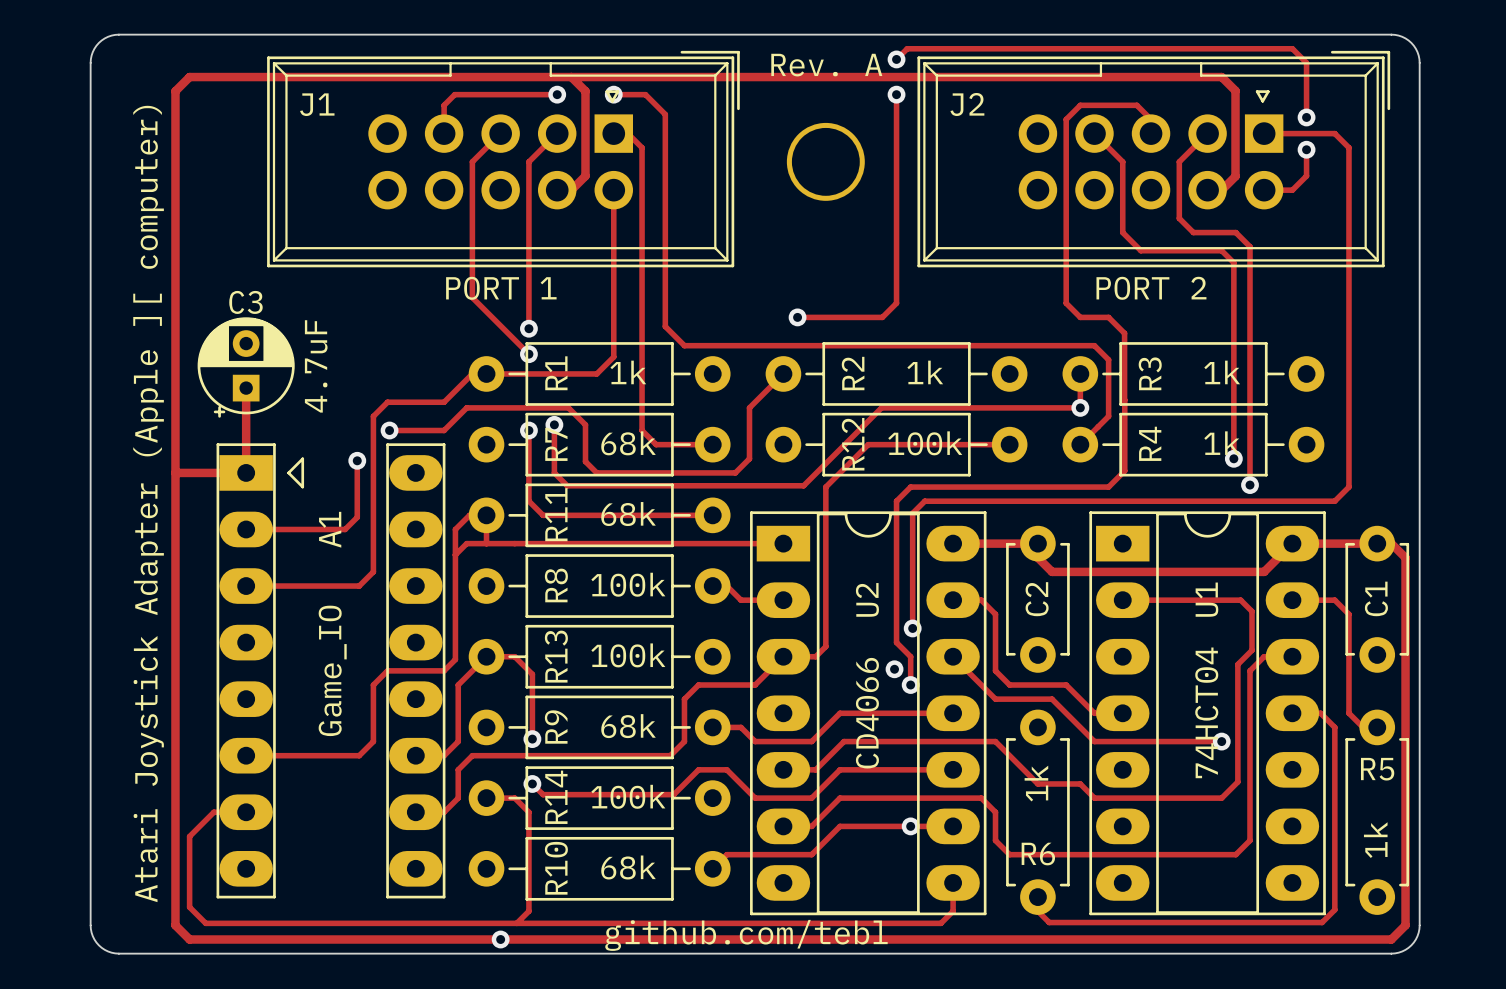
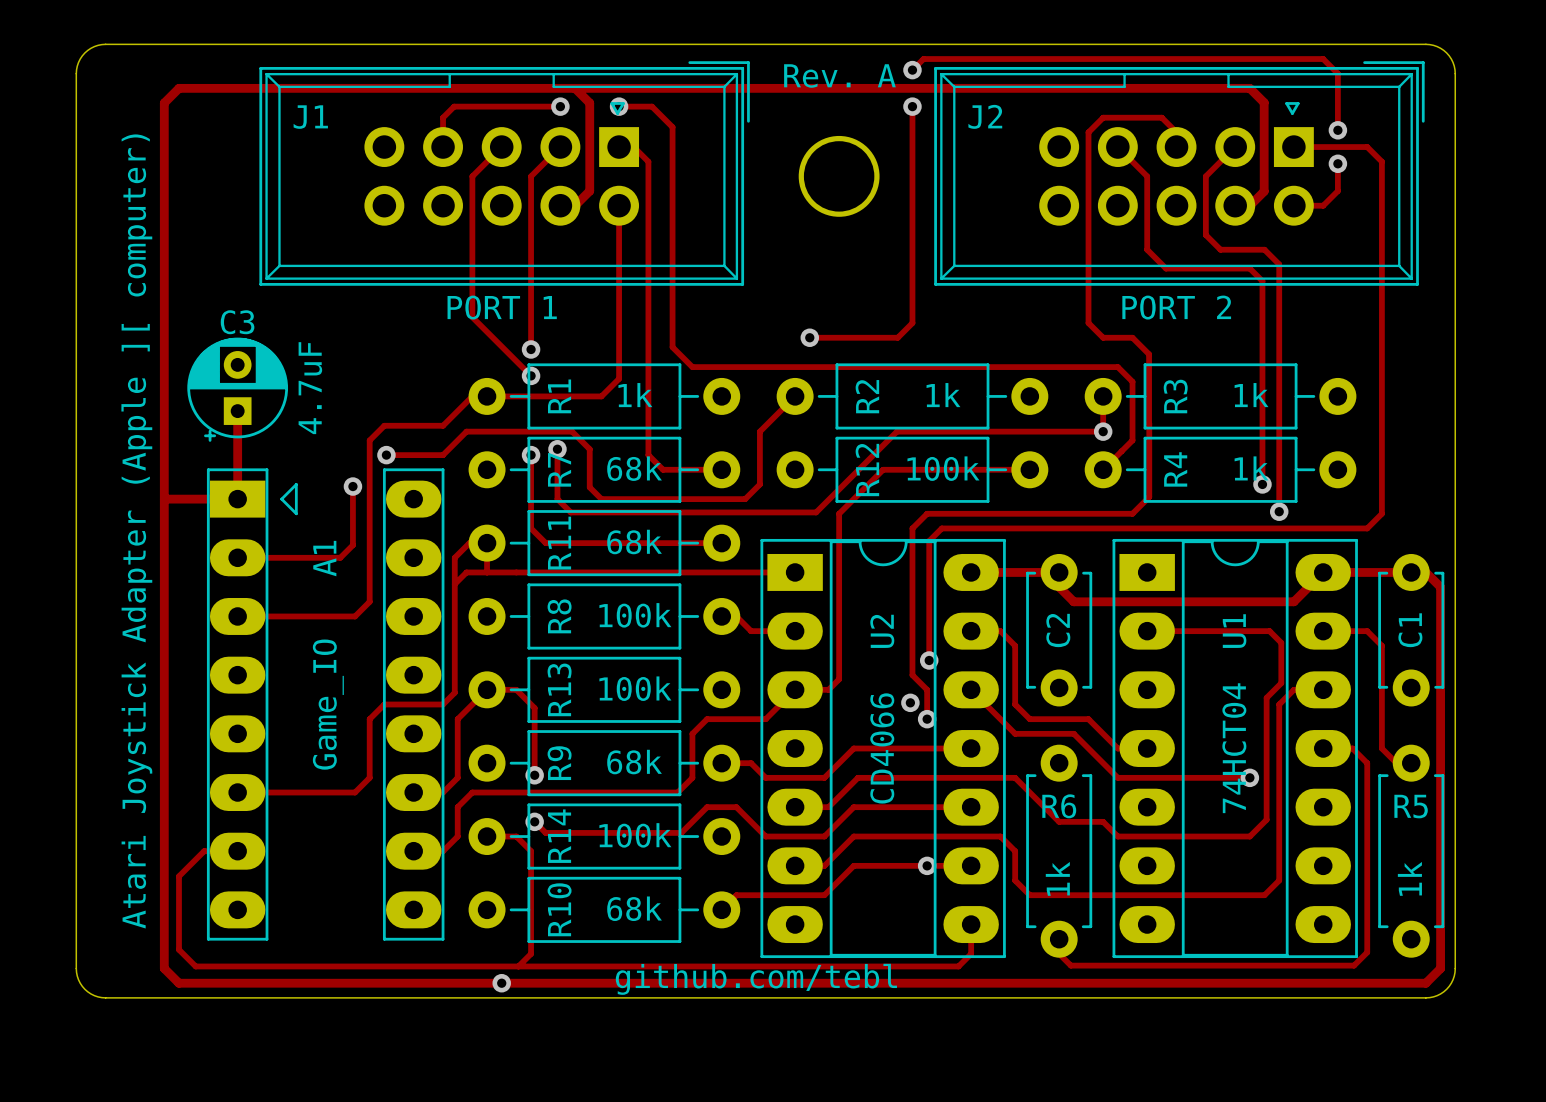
R6 value position: 1k (1036, 783) -> 1k (1057, 878)
R6 name position: R6 (1038, 854) -> R6 (1059, 806)

